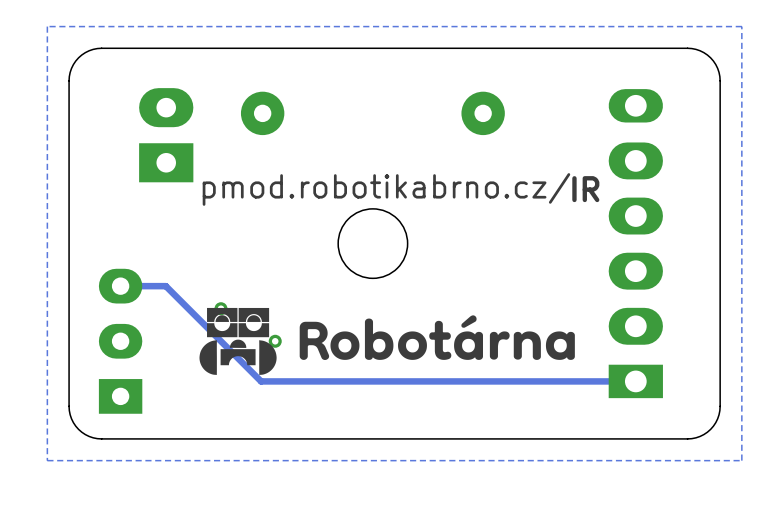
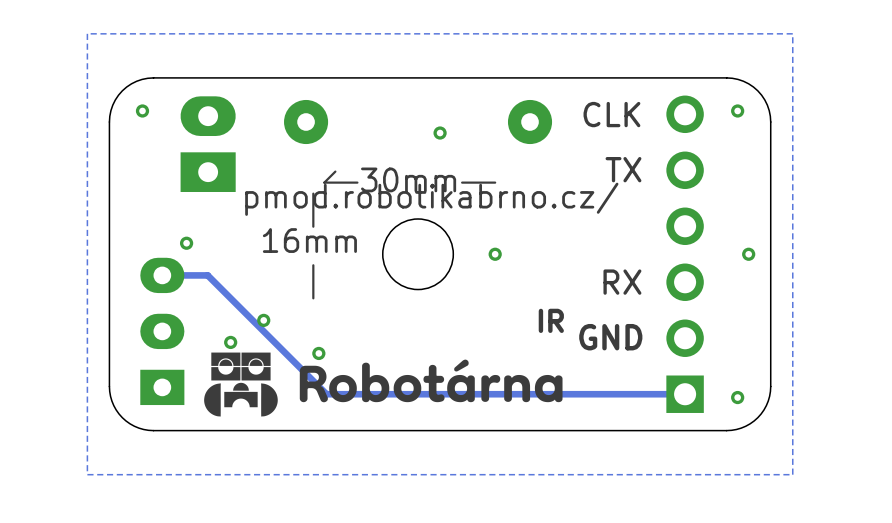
part footprint: [608, 89, 663, 399] -> [666, 95, 704, 413]
via: none -> (142, 110)
via: none -> (737, 110)
text: none -> CLK (611, 114)
board edge: (720, 113) (719, 76) (715, 64) (703, 52) (687, 48) (97, 48) (81, 55) (71, 68) (69, 80) (69, 113) -> (770, 122) (767, 105) (757, 90) (743, 81) (726, 77) (147, 78) (131, 83) (122, 90) (112, 105) (109, 122)
via: none -> (440, 133)
text: none -> TX (623, 169)
line: none -> (335, 171) (324, 182) (357, 182)
text: none -> 30mm (408, 179)
line: none -> (495, 182) (462, 182)
line: none -> (313, 193) (313, 226)
text position: IR (585, 189) -> IR (551, 320)
text: none -> 16mm (309, 240)
via: none -> (186, 243)
via: none -> (495, 254)
via: none -> (748, 254)
line: none -> (313, 265) (313, 298)
text: none -> RX (622, 282)
track: (120, 286) (165, 286) (261, 381) (282, 381) -> (162, 275) (207, 275) (326, 394)
drawing: [199, 307, 270, 375] -> none
drawing: [429, 315, 575, 360] -> none
drawing: [299, 318, 394, 360] -> none
text: none -> GND (610, 337)
via: none -> (230, 342)
drawing shape: [398, 331, 427, 360] -> [454, 359, 469, 372]
drawing: none -> [204, 352, 278, 417]
drawing shape: [259, 340, 277, 375] -> [299, 365, 328, 403]
part position: (120, 341) -> (162, 331)
drawing: none -> [329, 362, 563, 403]
board edge: (720, 373) (719, 410) (715, 422) (703, 434) (687, 438) (97, 438) (81, 432) (71, 418) (69, 406) (69, 373) -> (770, 386) (768, 401) (757, 417) (741, 428) (726, 430) (148, 430) (134, 426) (122, 417) (113, 405) (109, 386)
via: none -> (737, 397)

